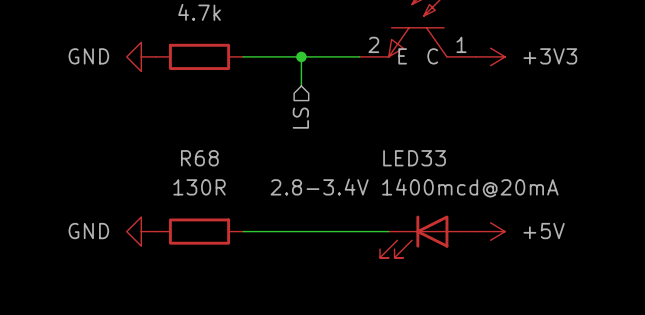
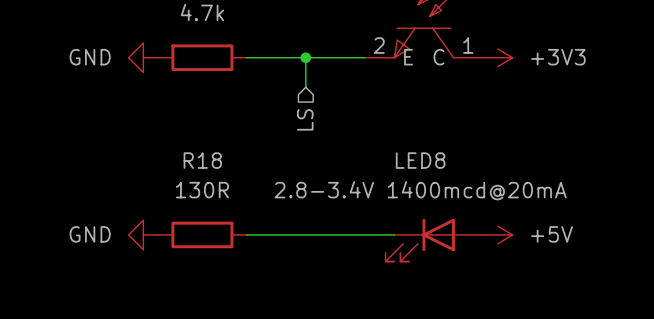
R68 name: R68 (199, 158) -> R18 (202, 160)
LED33 name: LED33 (414, 158) -> LED8 (420, 160)

